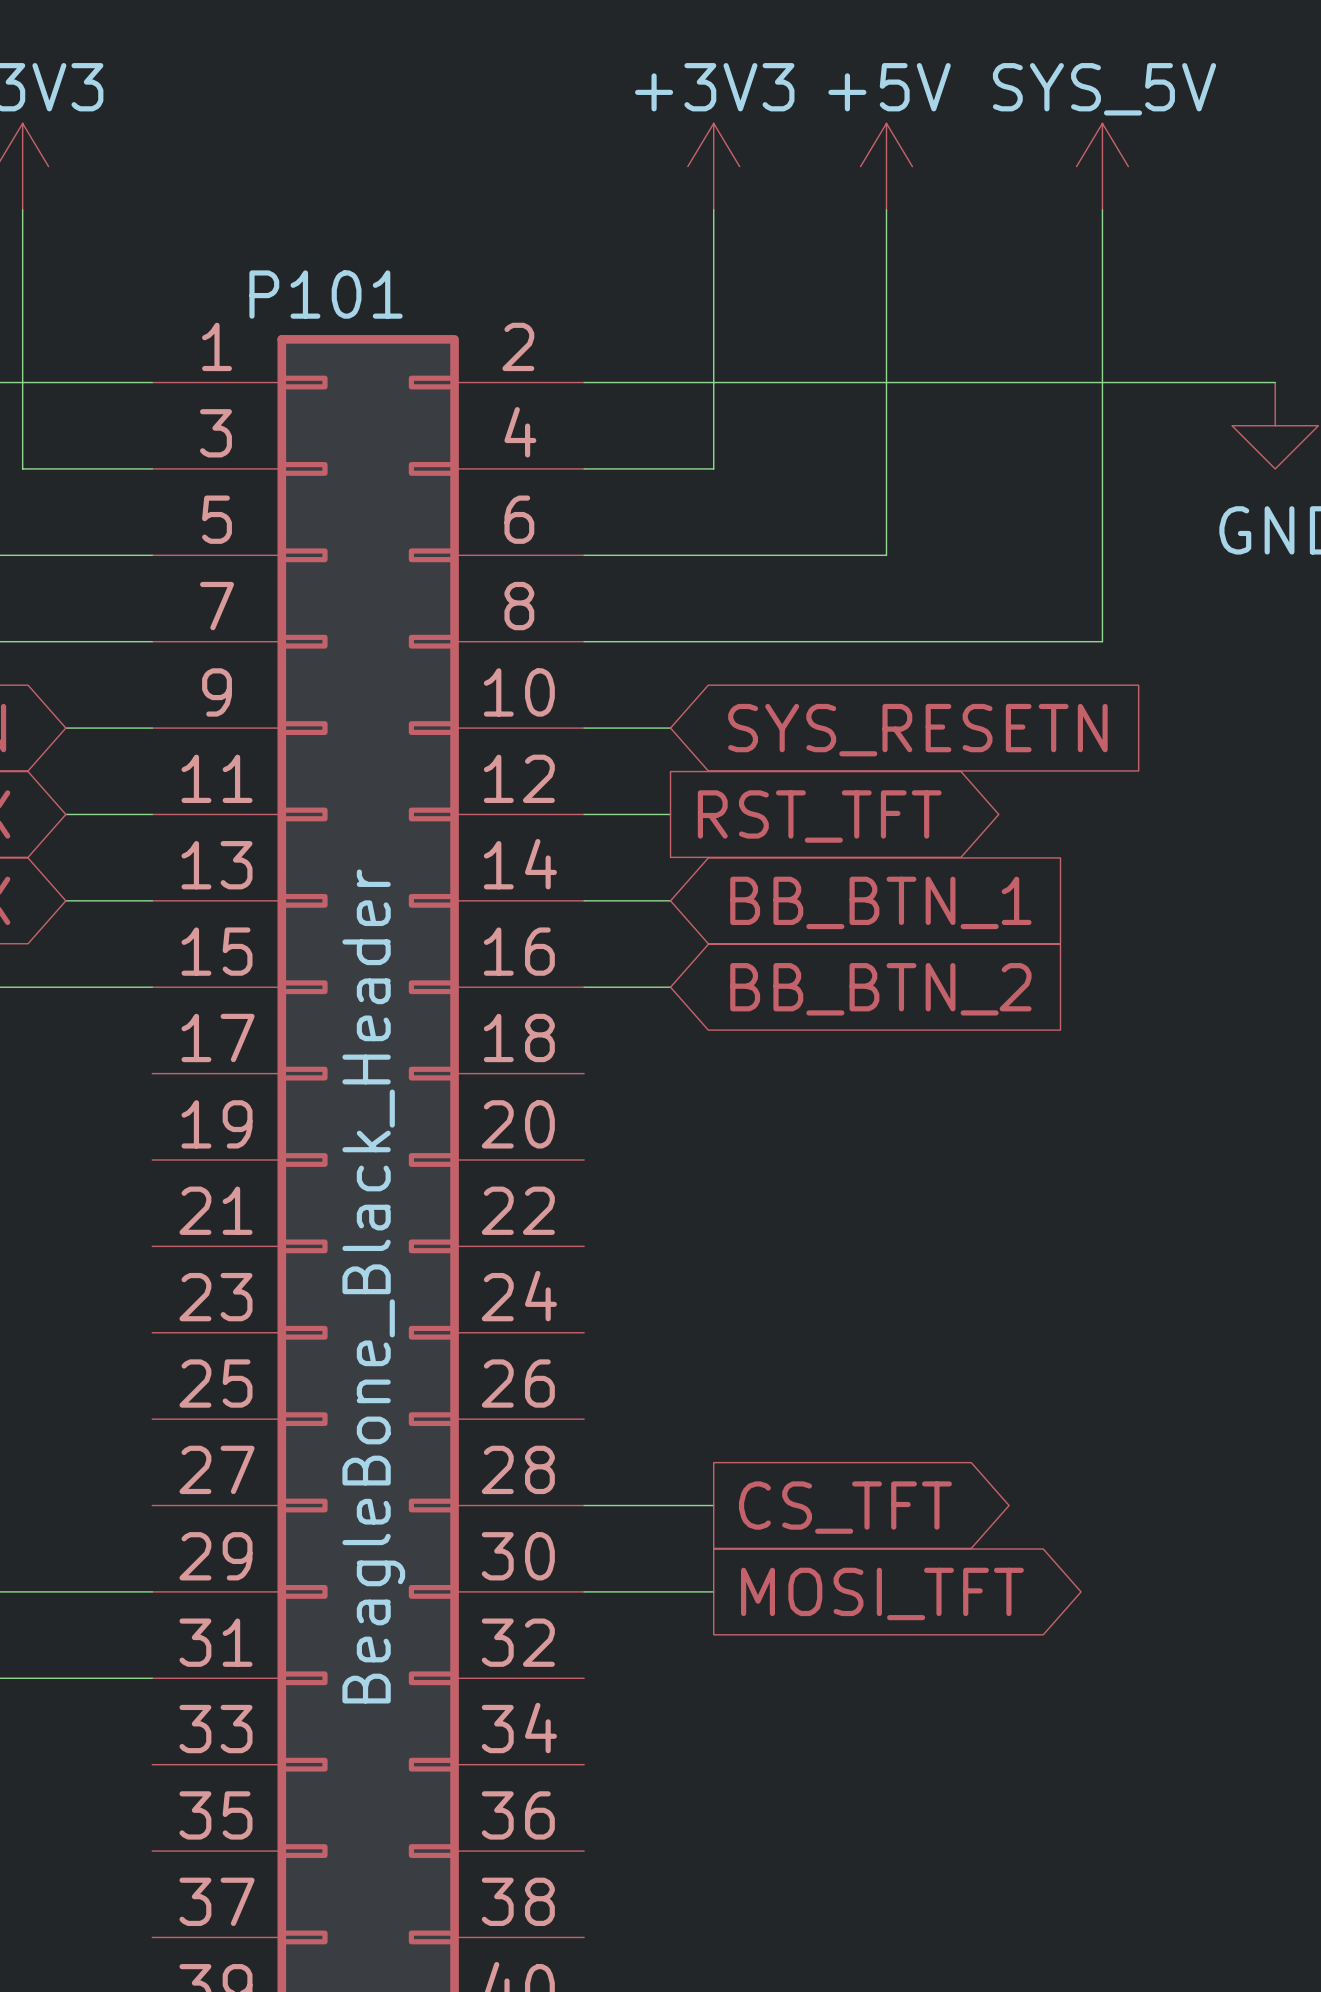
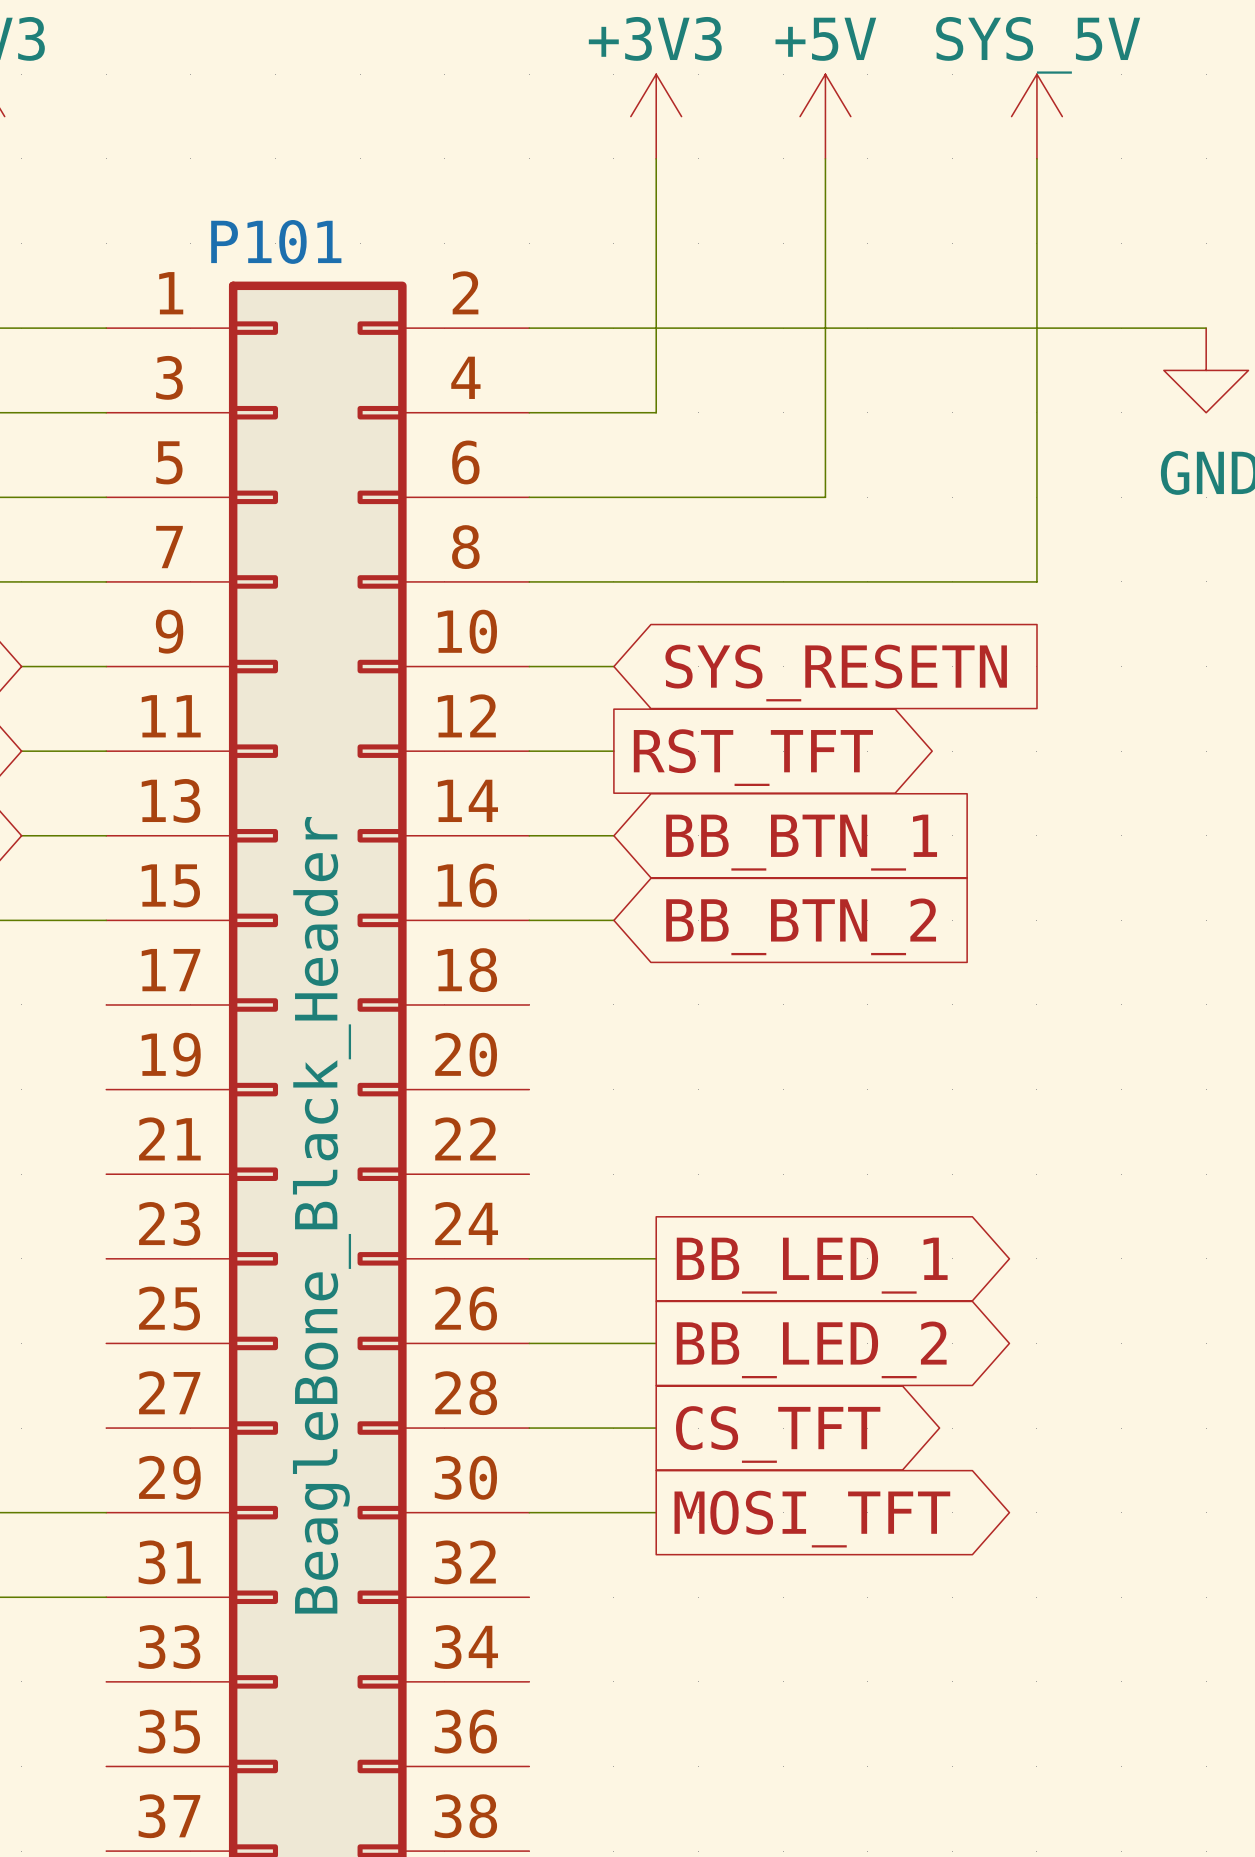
wire: none -> (529, 1258) (656, 1258)
global label: none -> BB_LED_1 (812, 1265)
wire: none -> (529, 1343) (656, 1343)
global label: none -> BB_LED_2 (811, 1349)

